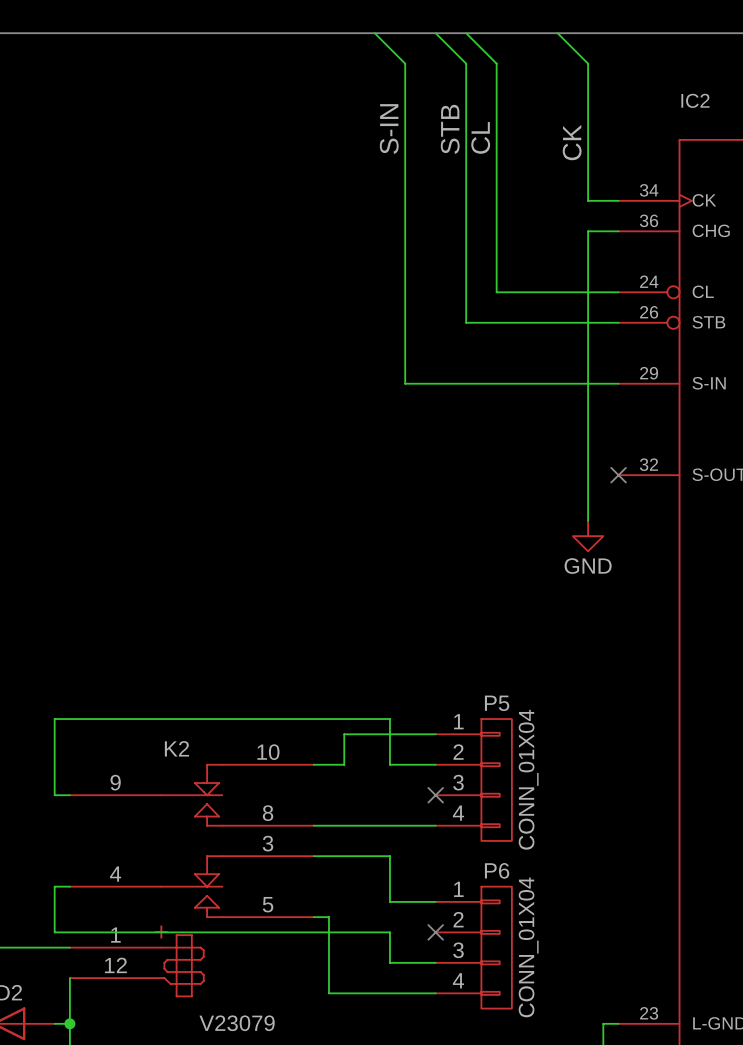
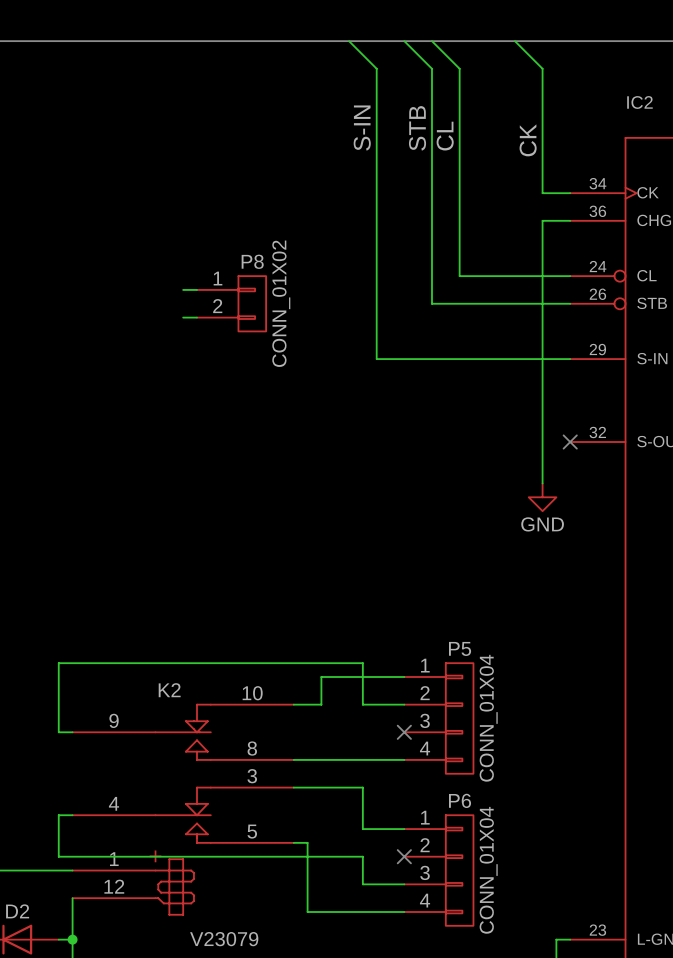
wire: none -> (183, 289) (196, 289)
P8: none -> CONN_01X02 (231, 303)
wire: none -> (183, 317) (196, 317)

